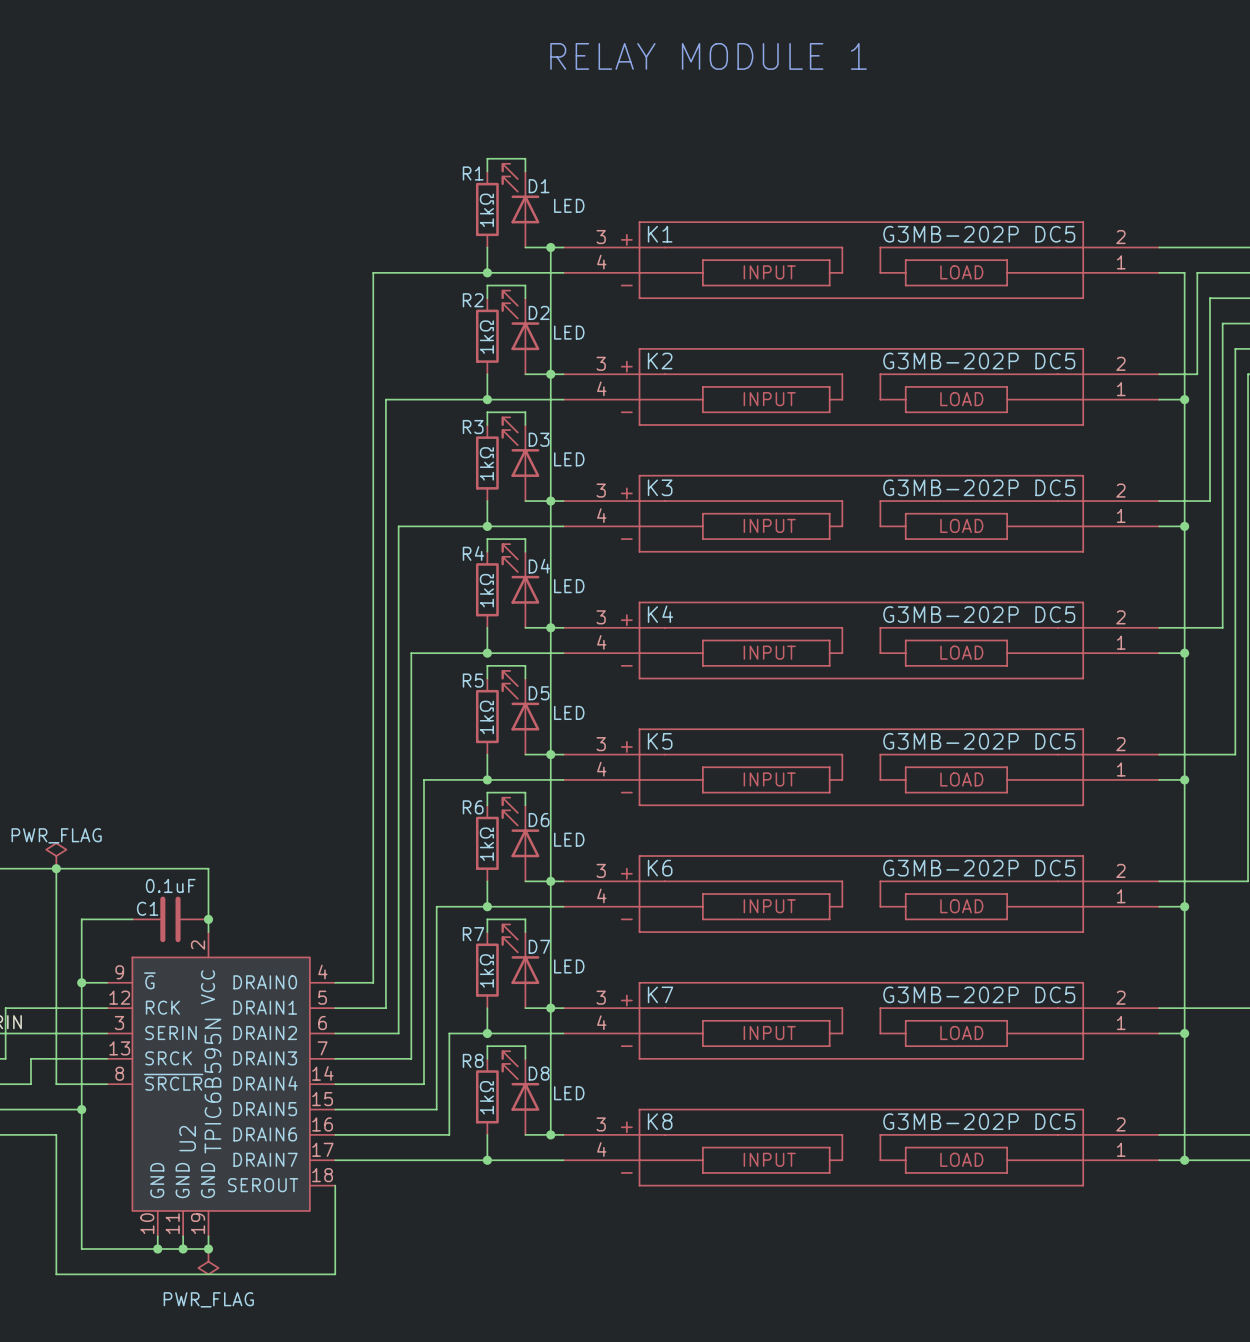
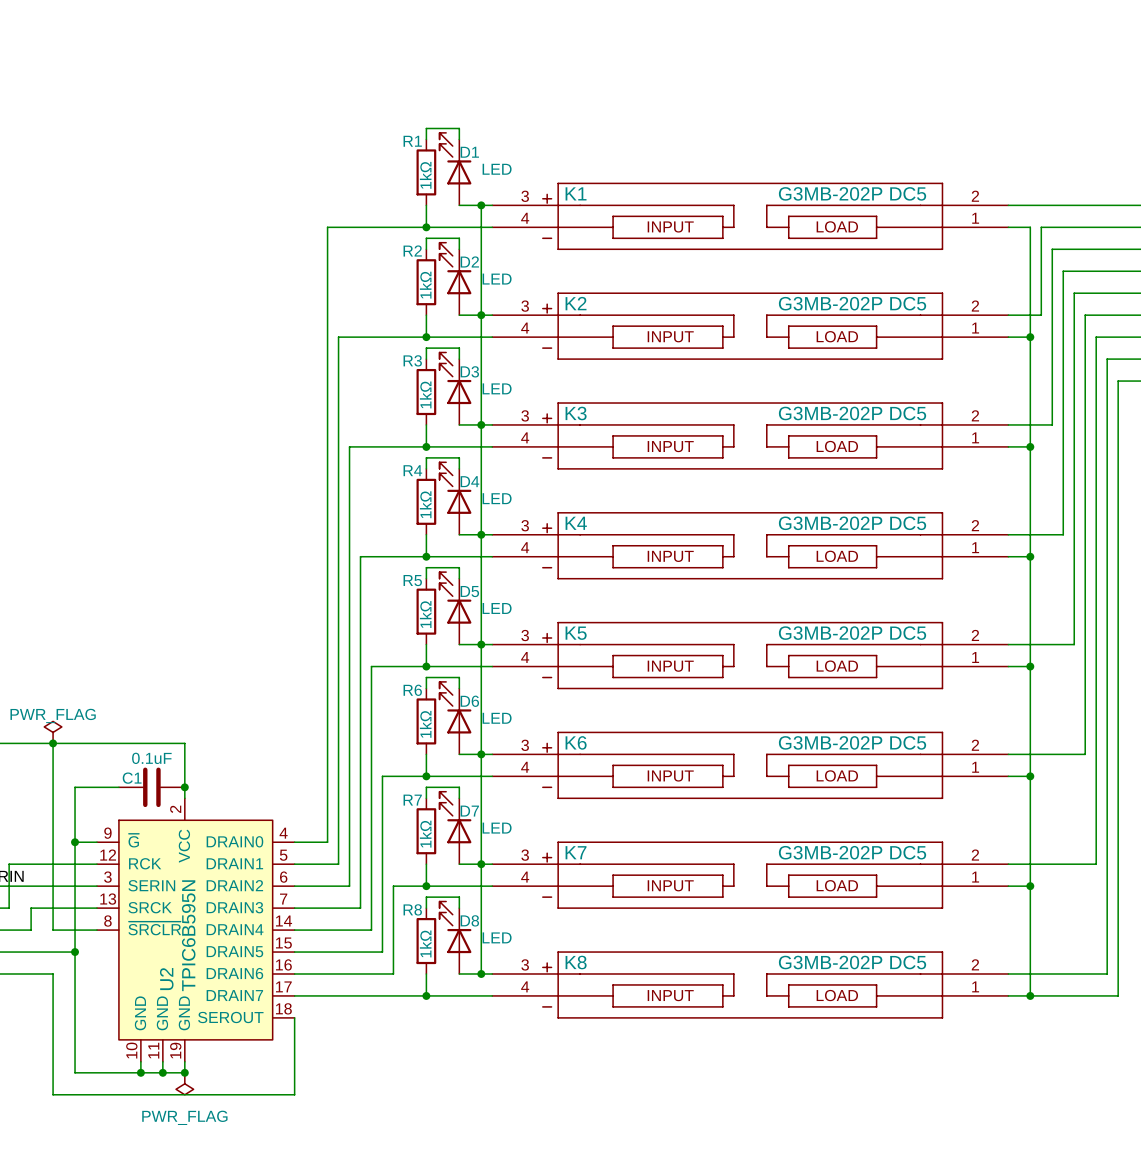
text: RELAY MODULE 1 (708, 56) -> none

